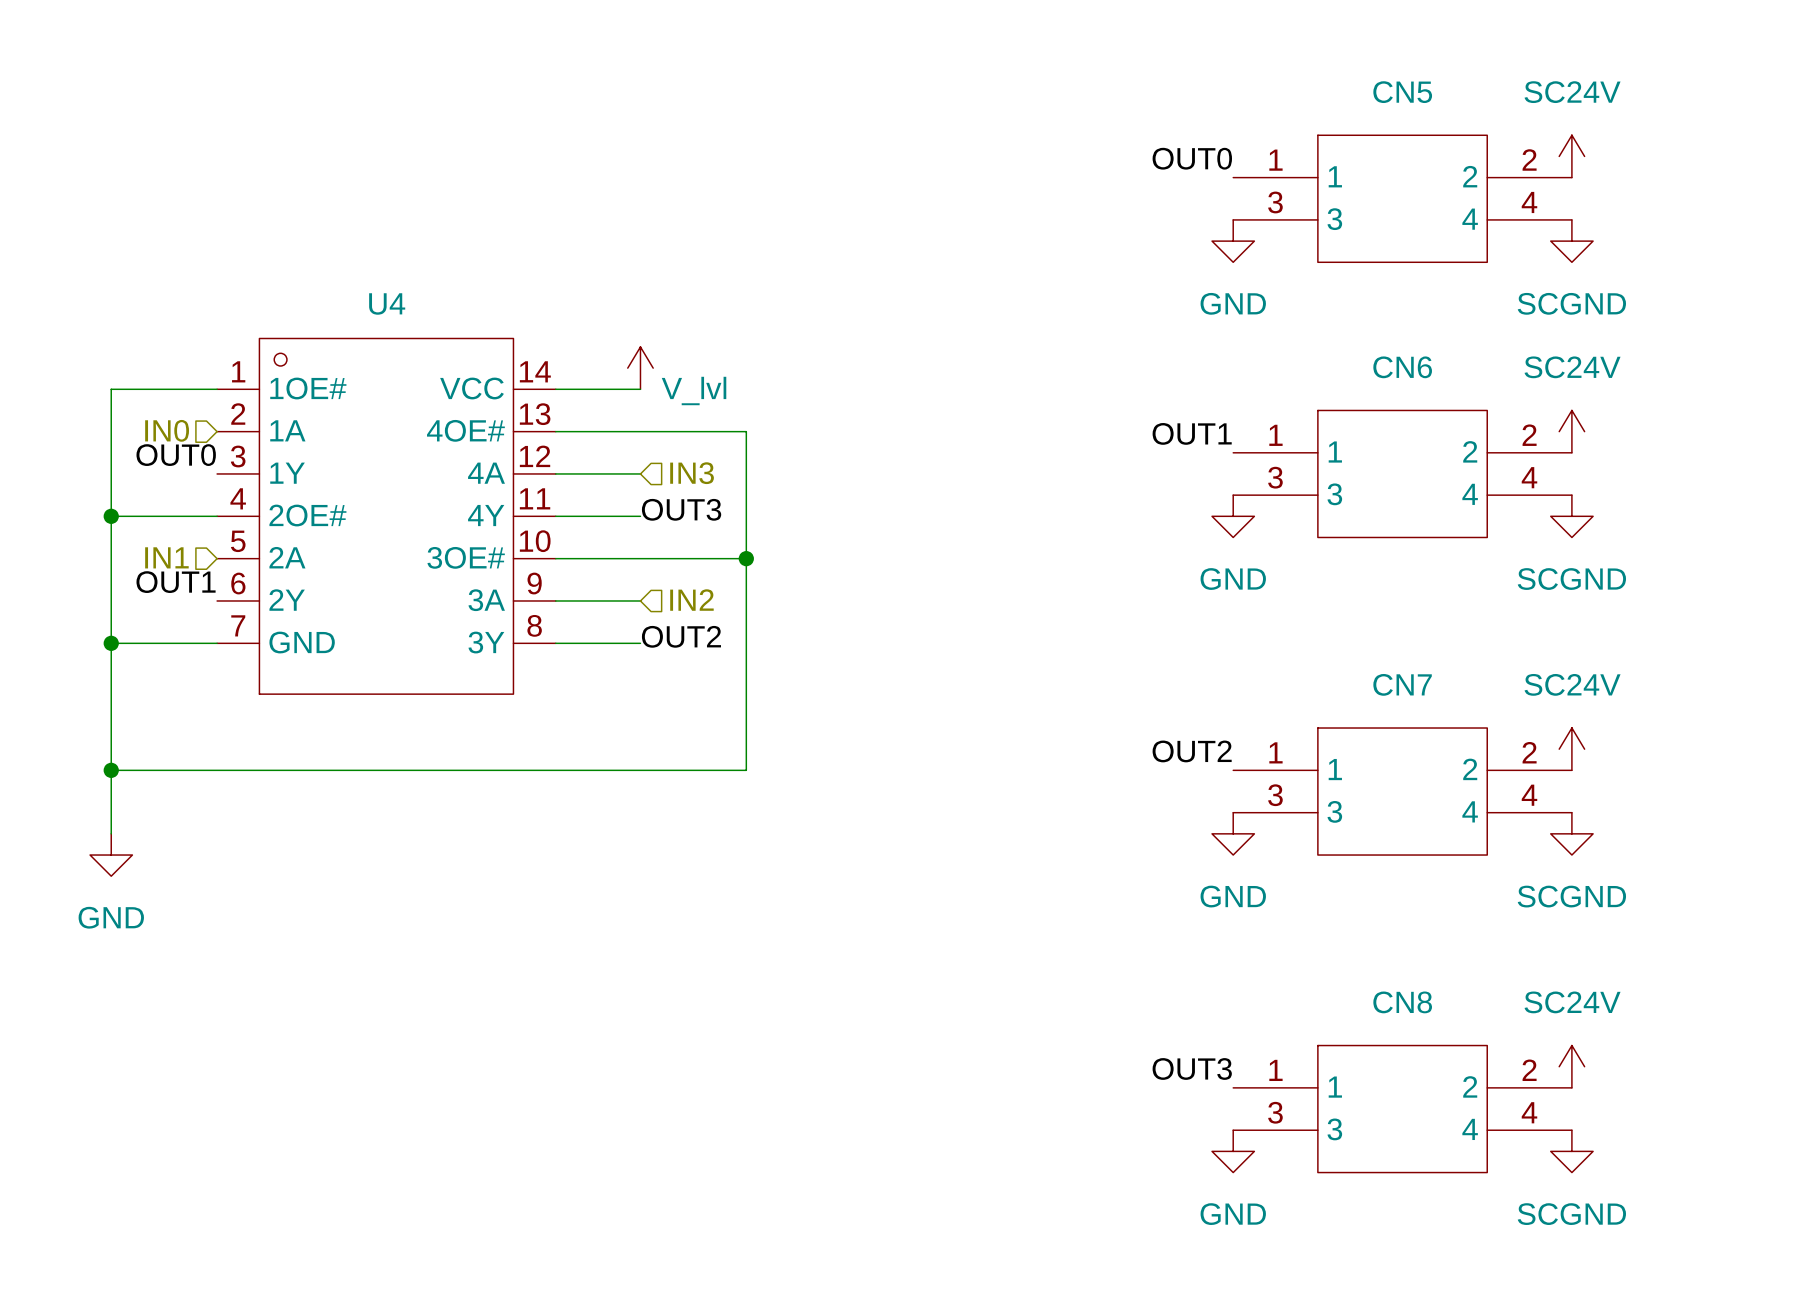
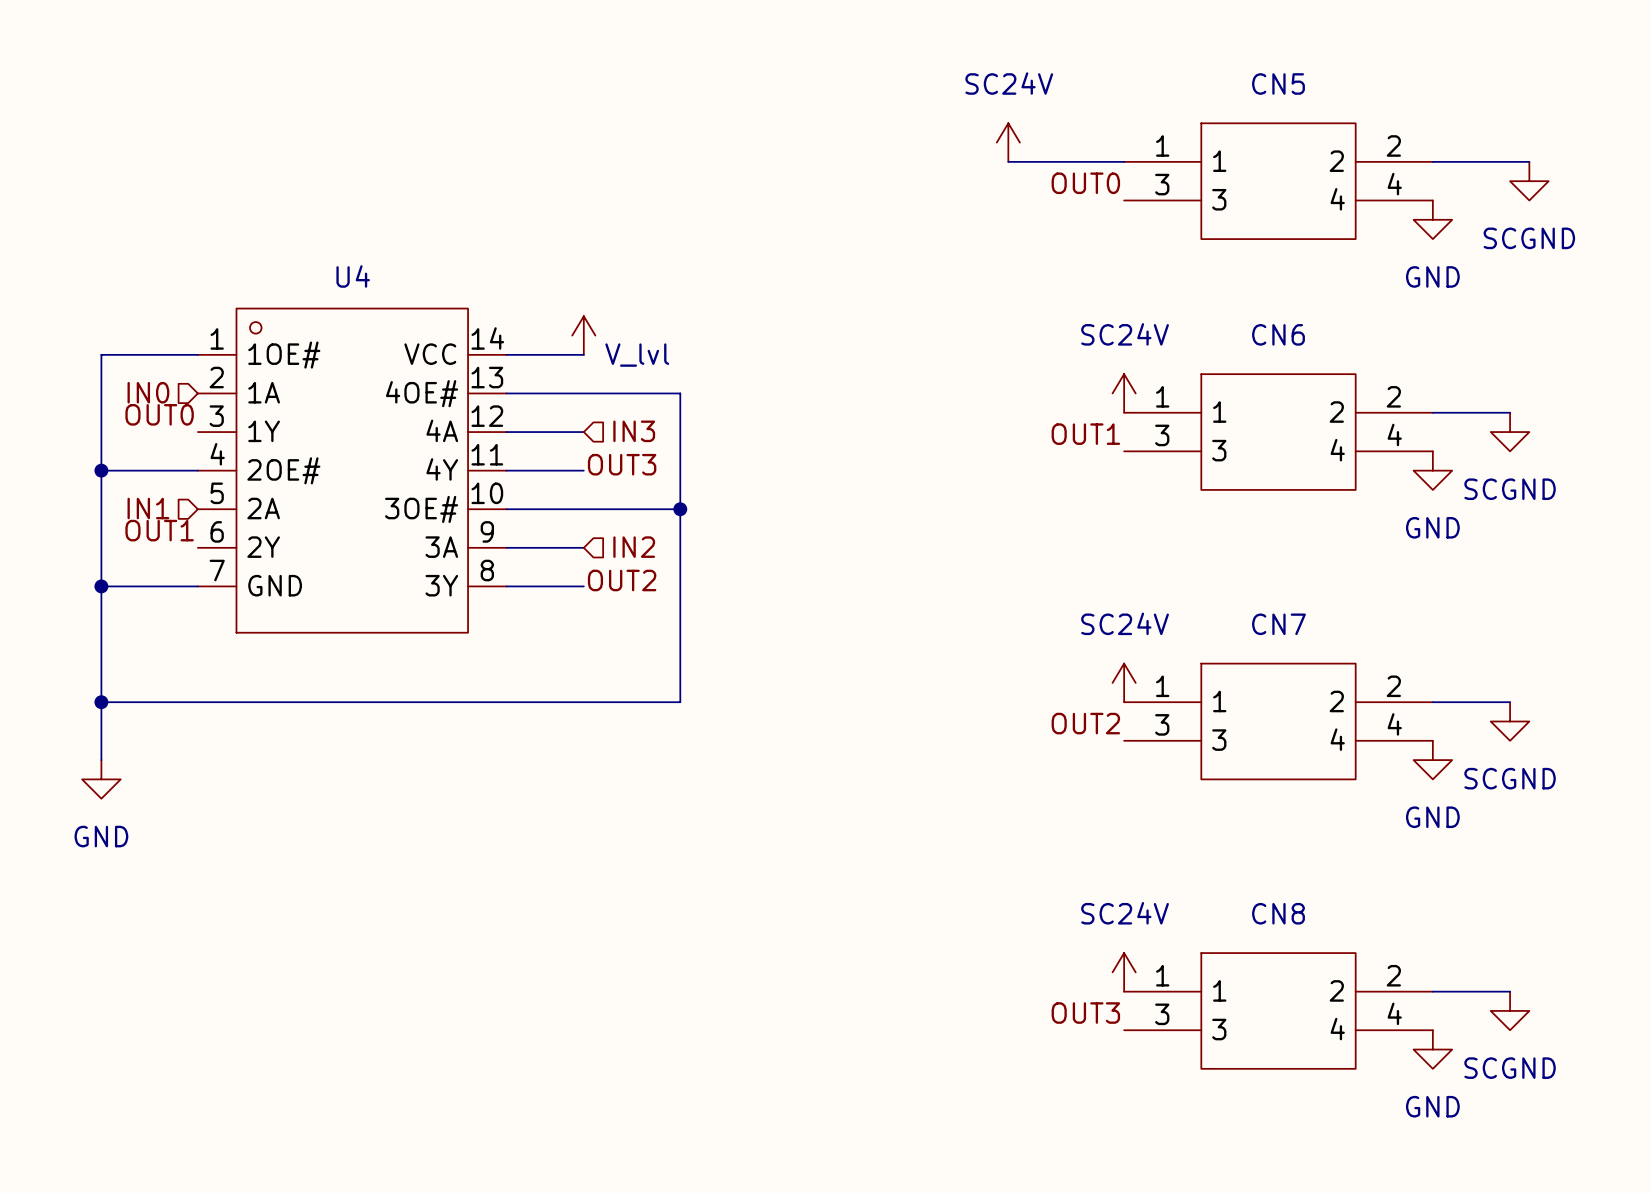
power symbol: none -> SC24V (1008, 142)
power symbol: SC24V (1571, 156) -> none
label position: OUT0 (1192, 158) -> OUT0 (1085, 183)
wire: none -> (1008, 161) (1124, 161)
wire: none -> (1432, 161) (1529, 161)
power symbol: none -> SCGND (1529, 181)
power symbol: GND (1233, 241) -> none
power symbol: SCGND (1571, 241) -> GND (1432, 219)
power symbol: none -> SC24V (1124, 393)
power symbol: SC24V (1571, 431) -> none
label position: OUT1 (1192, 433) -> OUT1 (1085, 434)
wire: none -> (1432, 412) (1510, 412)
power symbol: none -> SCGND (1510, 432)
power symbol: GND (1233, 516) -> none
power symbol: SCGND (1571, 516) -> GND (1432, 470)
power symbol: none -> SC24V (1124, 682)
power symbol: SC24V (1571, 749) -> none
label position: OUT2 (1192, 751) -> OUT2 (1085, 723)
wire: none -> (1432, 702) (1510, 702)
power symbol: none -> SCGND (1510, 721)
power symbol: GND (1233, 833) -> none
power symbol: SCGND (1571, 833) -> GND (1432, 760)
power symbol: none -> SC24V (1124, 972)
power symbol: SC24V (1571, 1066) -> none
label position: OUT3 (1192, 1068) -> OUT3 (1085, 1013)
wire: none -> (1432, 991) (1510, 991)
power symbol: none -> SCGND (1510, 1010)
power symbol: GND (1233, 1151) -> none
power symbol: SCGND (1571, 1151) -> GND (1432, 1049)

